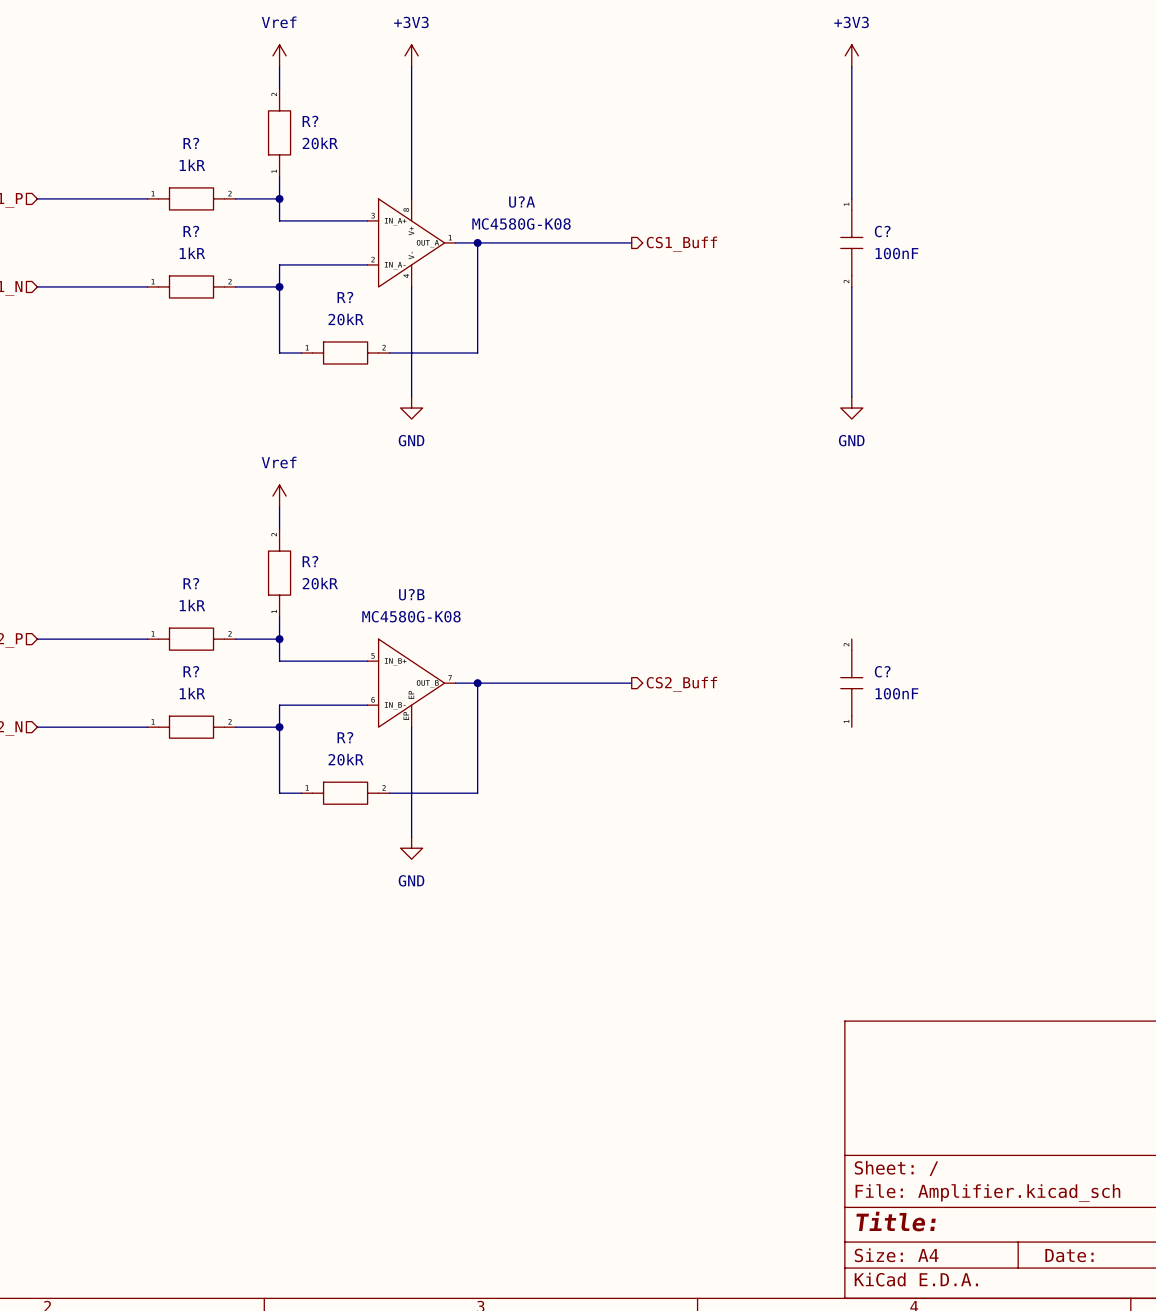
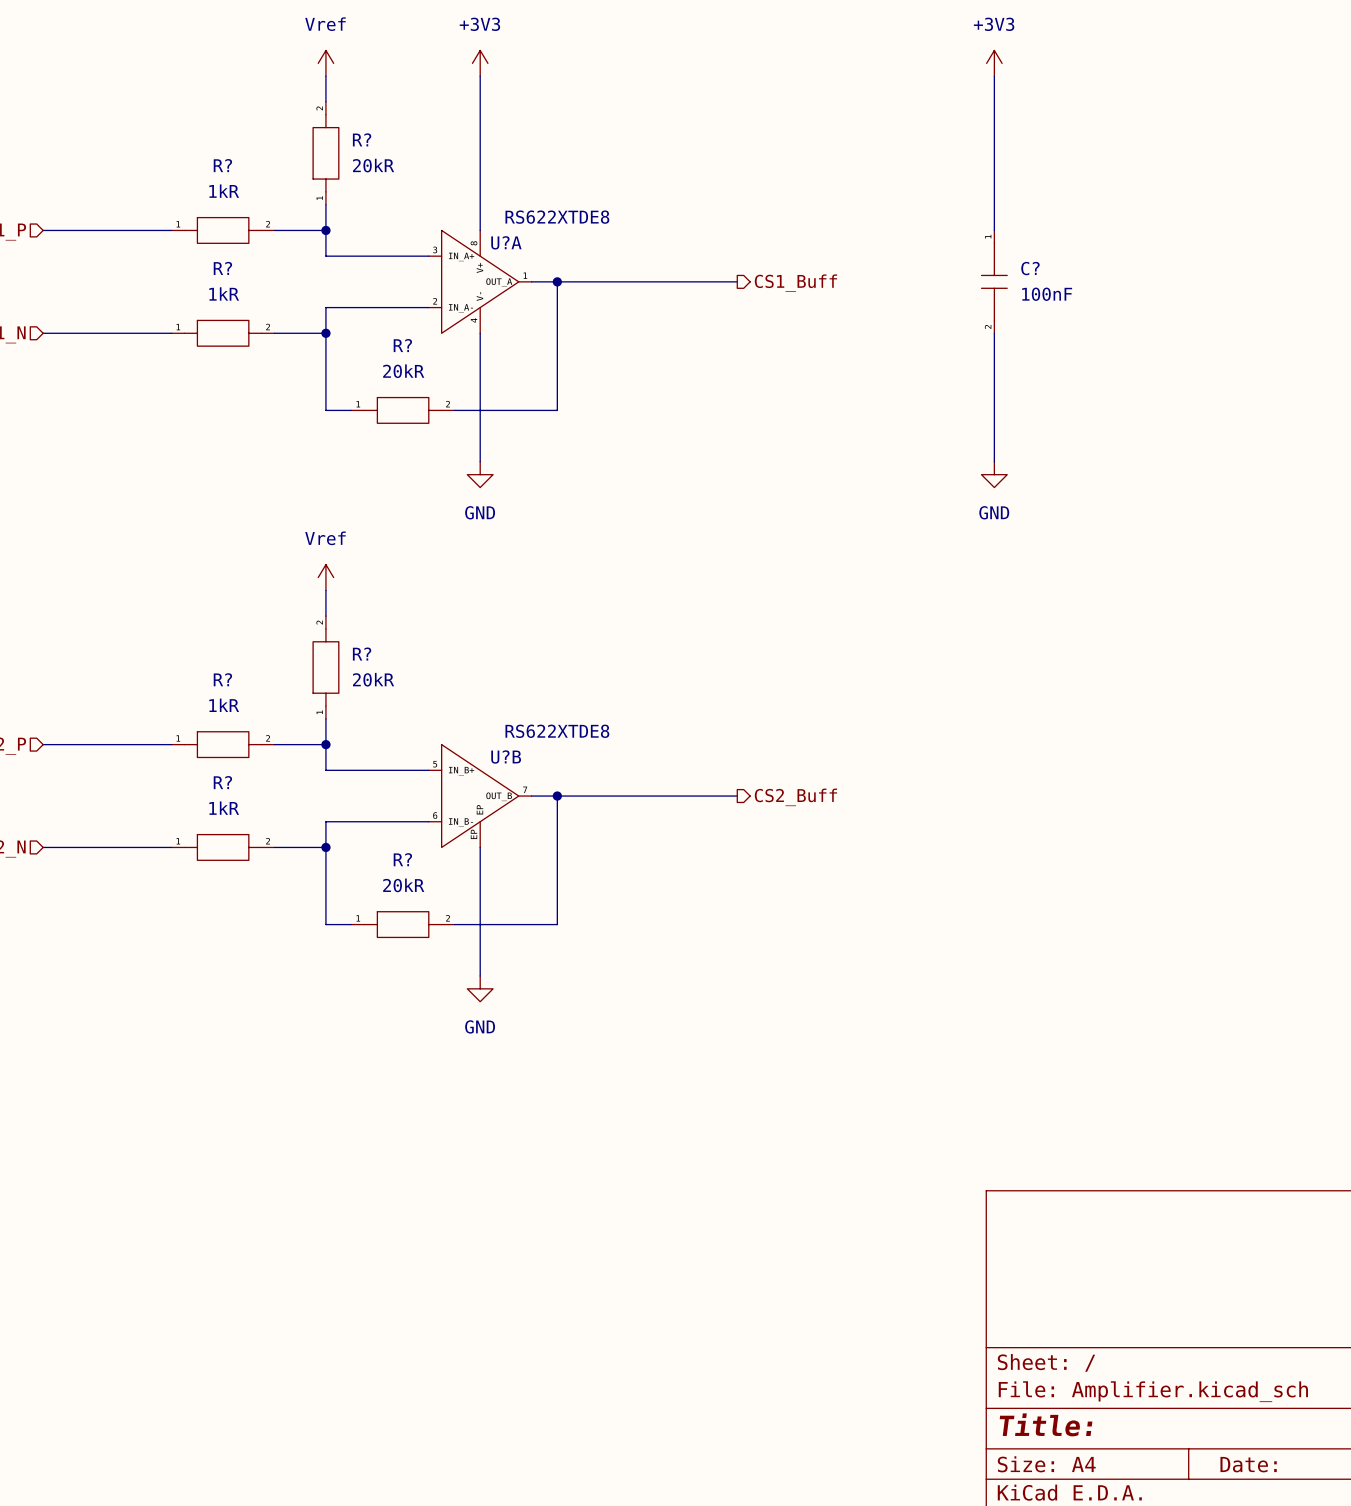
U?A name position: U?A (522, 201) -> U?A (506, 242)
U?A value: MC4580G-K08 (521, 224) -> RS622XTDE8 (557, 217)
U?B name position: U?B (411, 594) -> U?B (506, 757)
U?B value: MC4580G-K08 (411, 616) -> RS622XTDE8 (557, 731)
C?: 100nF (851, 683) -> none

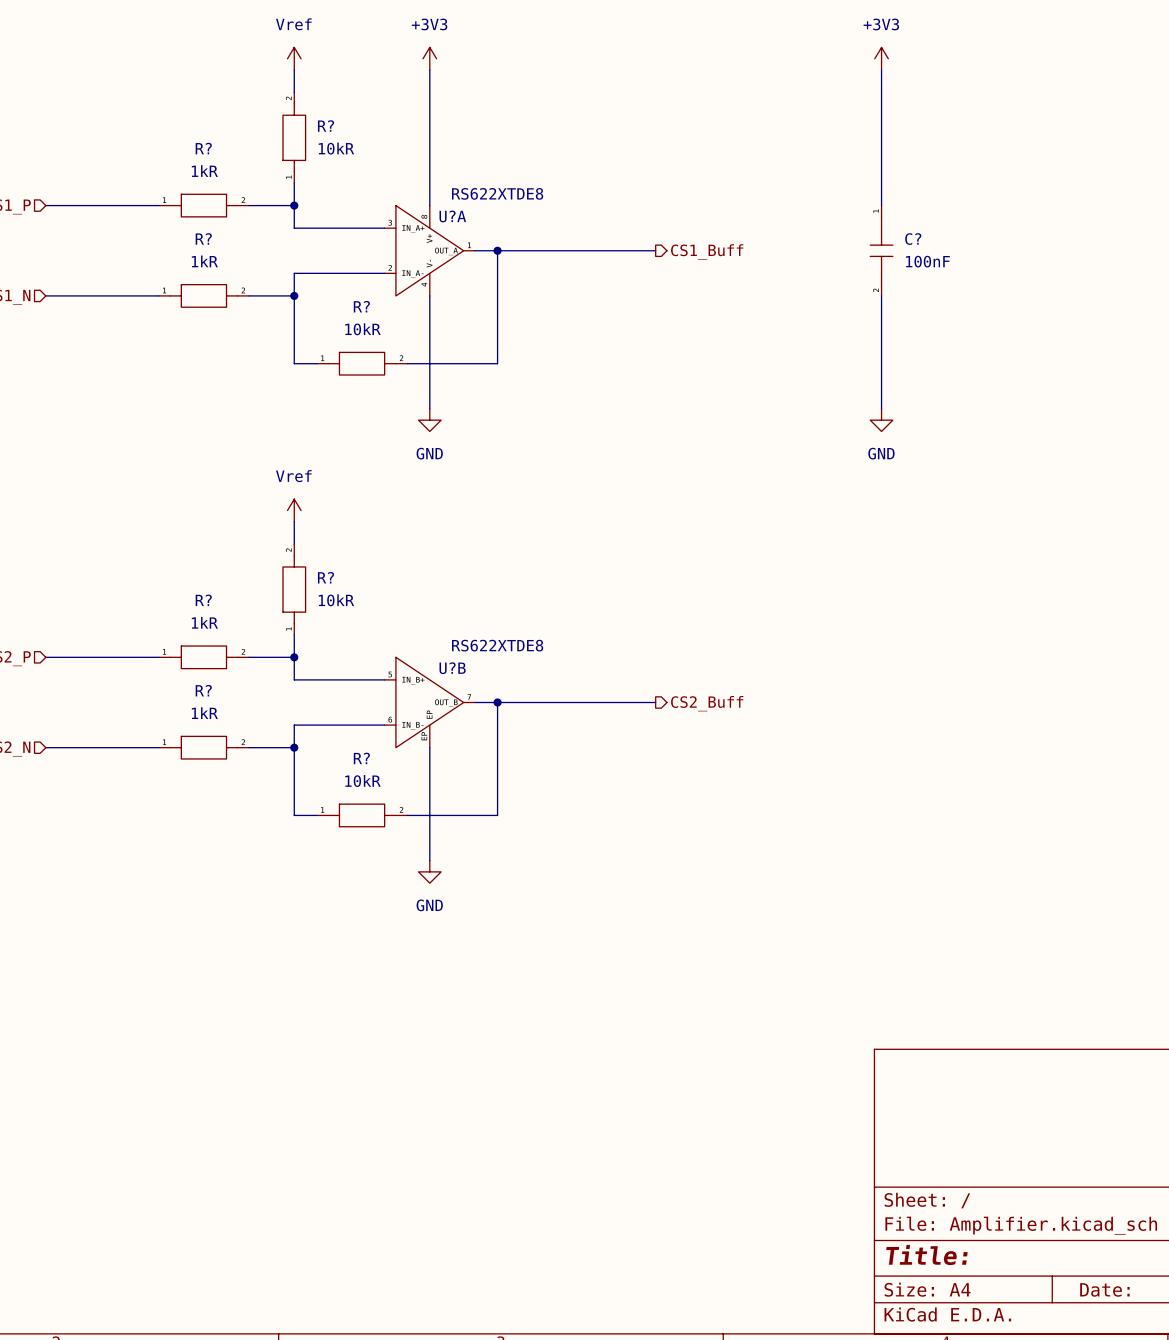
R? value: 20kR (373, 165) -> 10kR (336, 148)
R? value: 20kR (403, 371) -> 10kR (362, 329)
R? value: 20kR (373, 679) -> 10kR (336, 600)
R? value: 20kR (403, 885) -> 10kR (362, 781)

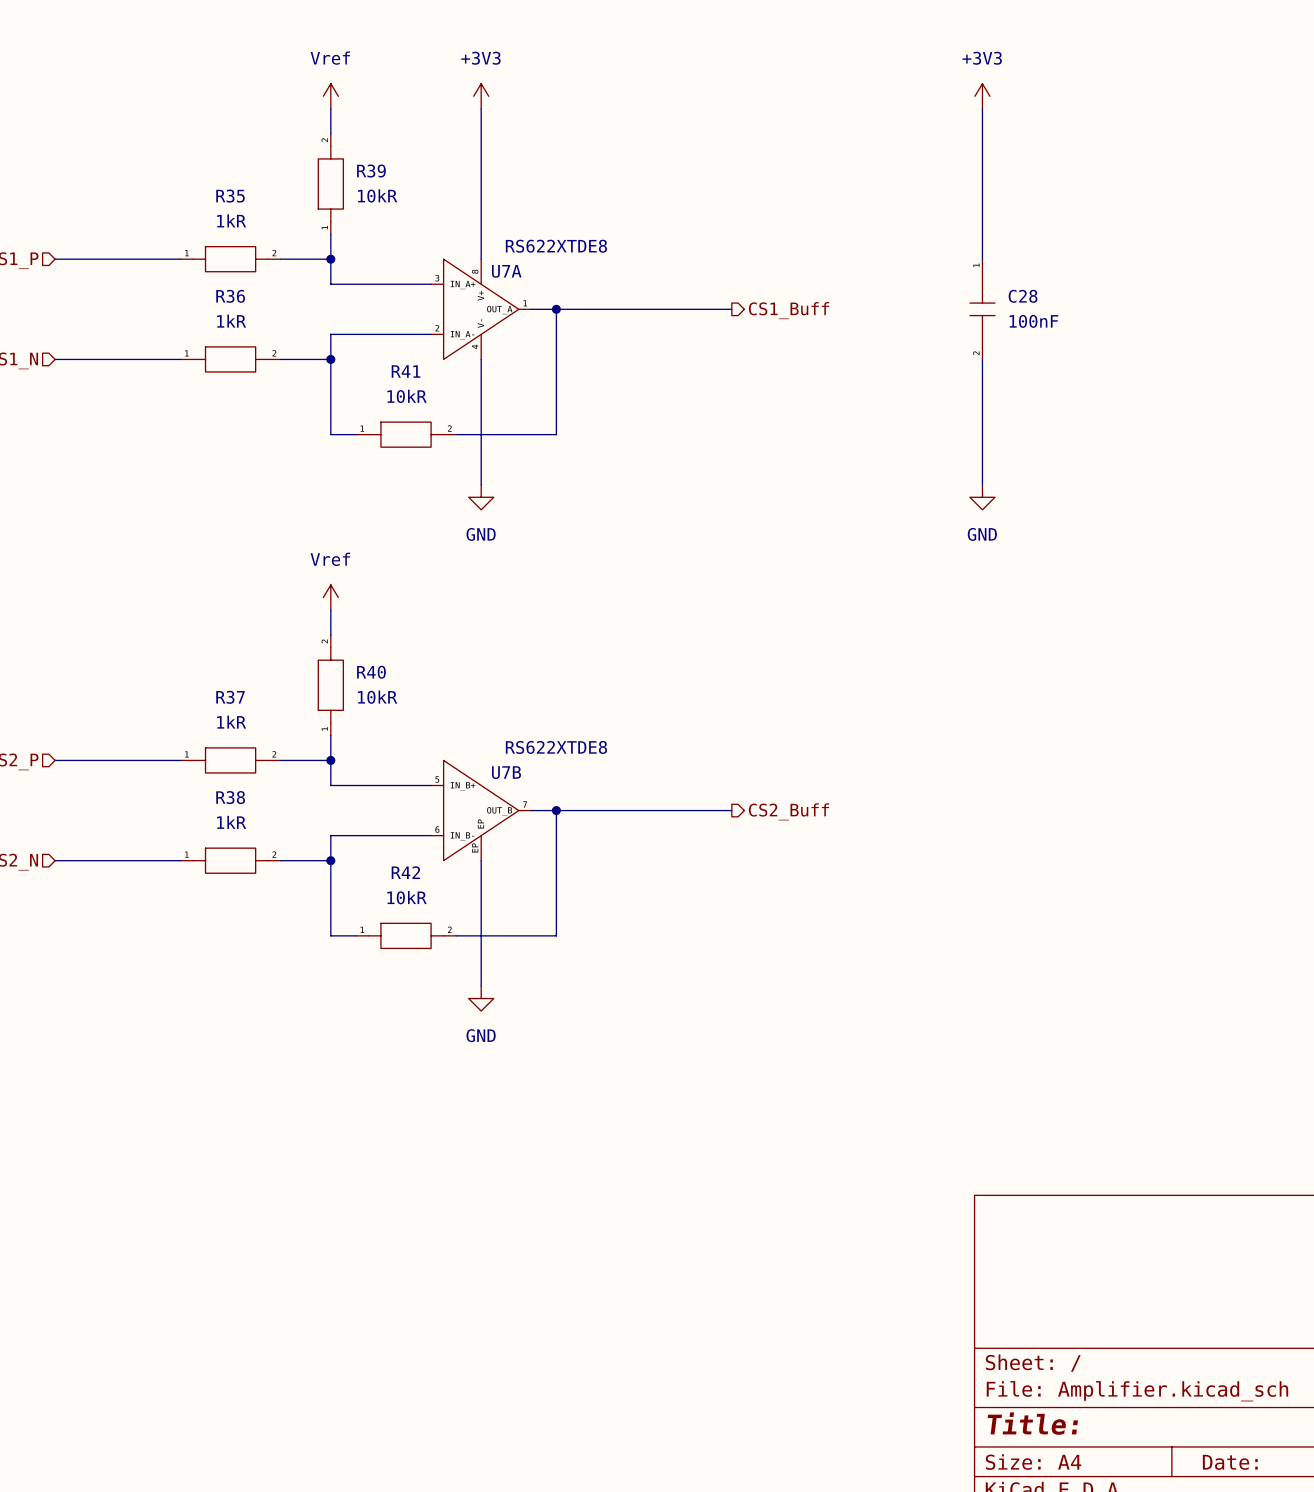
R? name: R? (326, 126) -> R39 (371, 171)
R? name: R? (203, 148) -> R35 (230, 196)
U?A name: U?A (452, 216) -> U7A (506, 271)
R? name: R? (203, 238) -> R36 (230, 296)
C? name: C? (913, 239) -> C28 (1023, 296)
R? name: R? (361, 306) -> R41 (406, 371)
R? name: R? (326, 577) -> R40 (371, 672)
R? name: R? (203, 600) -> R37 (230, 697)
U?B name: U?B (452, 668) -> U7B (506, 772)
R? name: R? (203, 690) -> R38 (230, 797)
R? name: R? (361, 758) -> R42 (405, 872)

